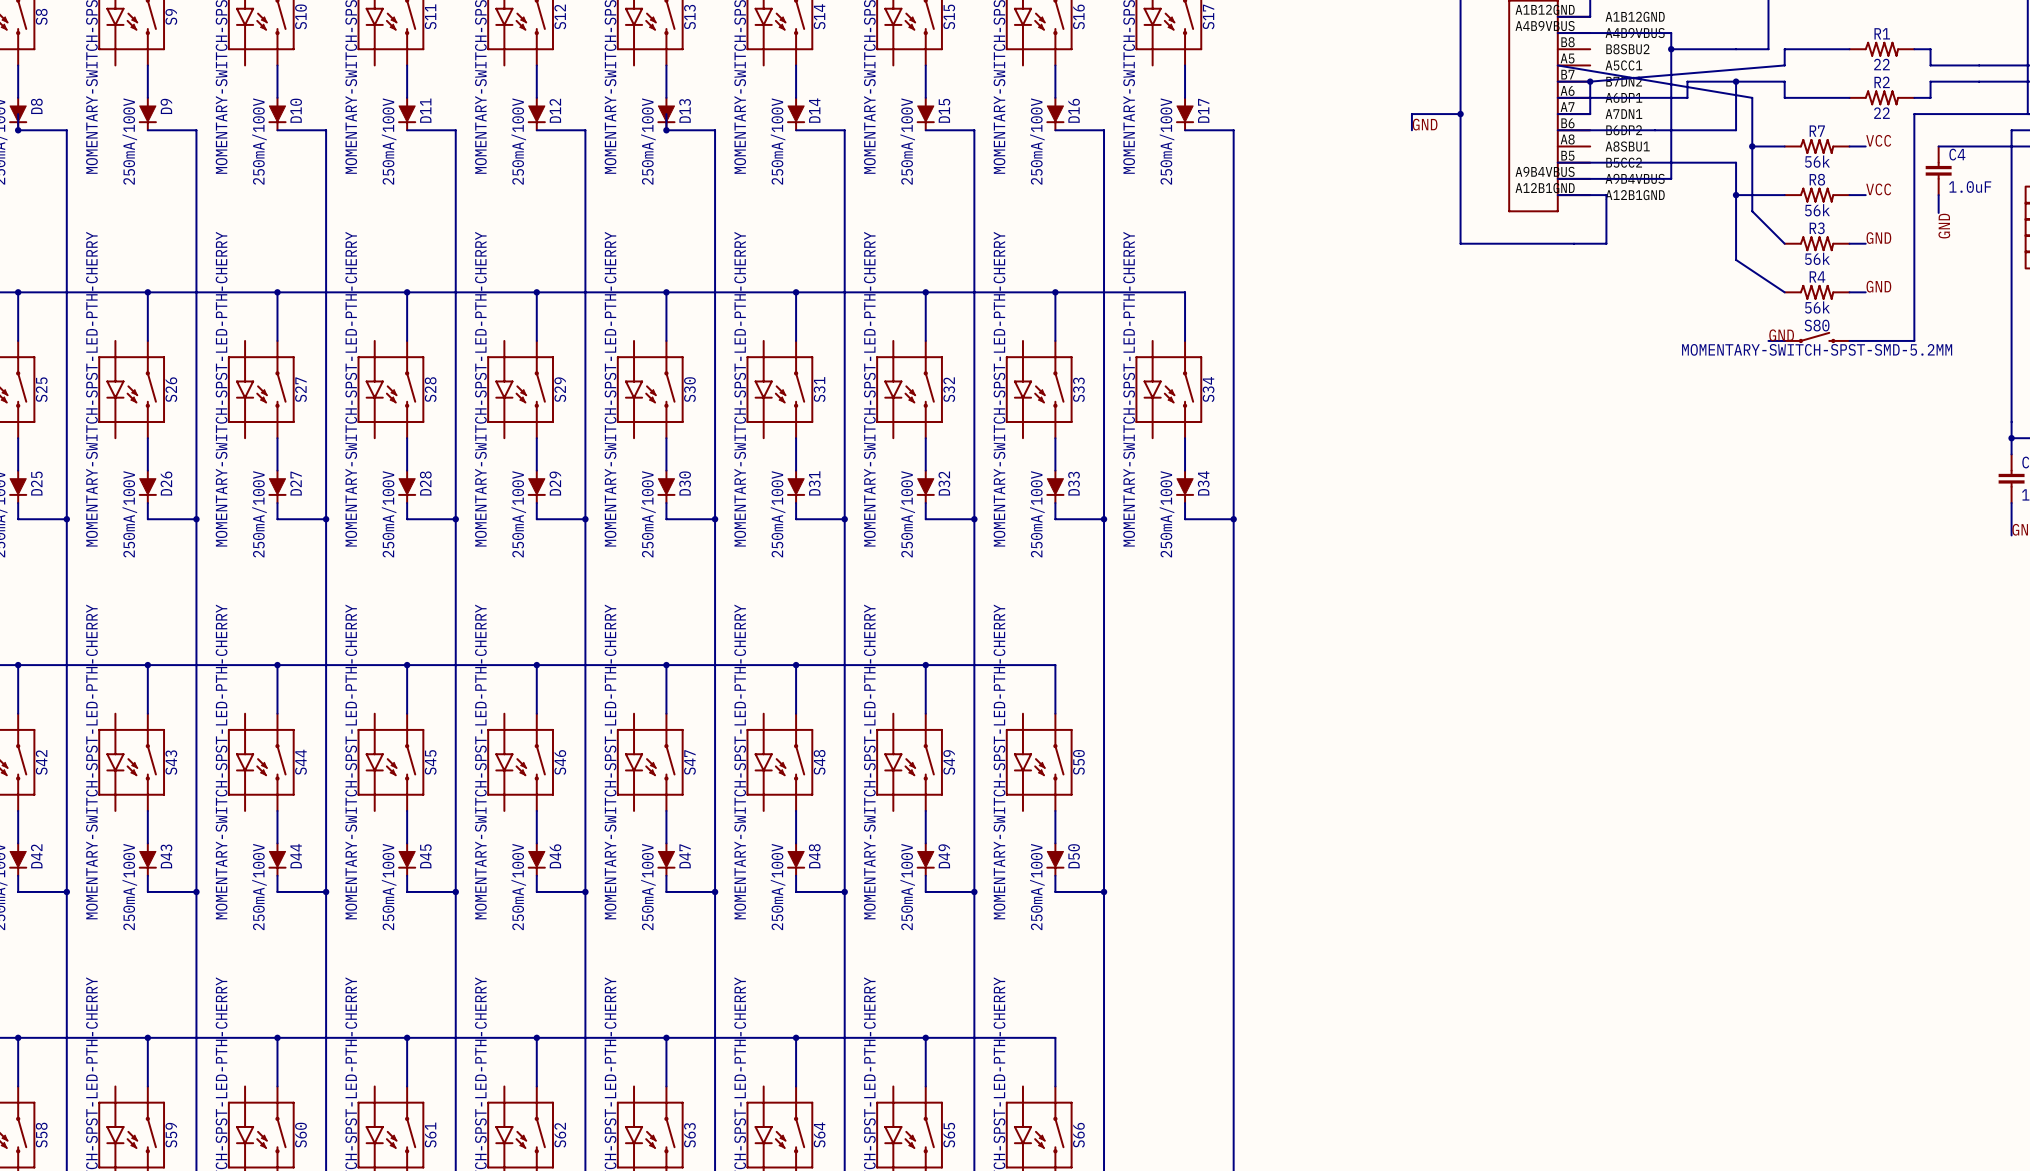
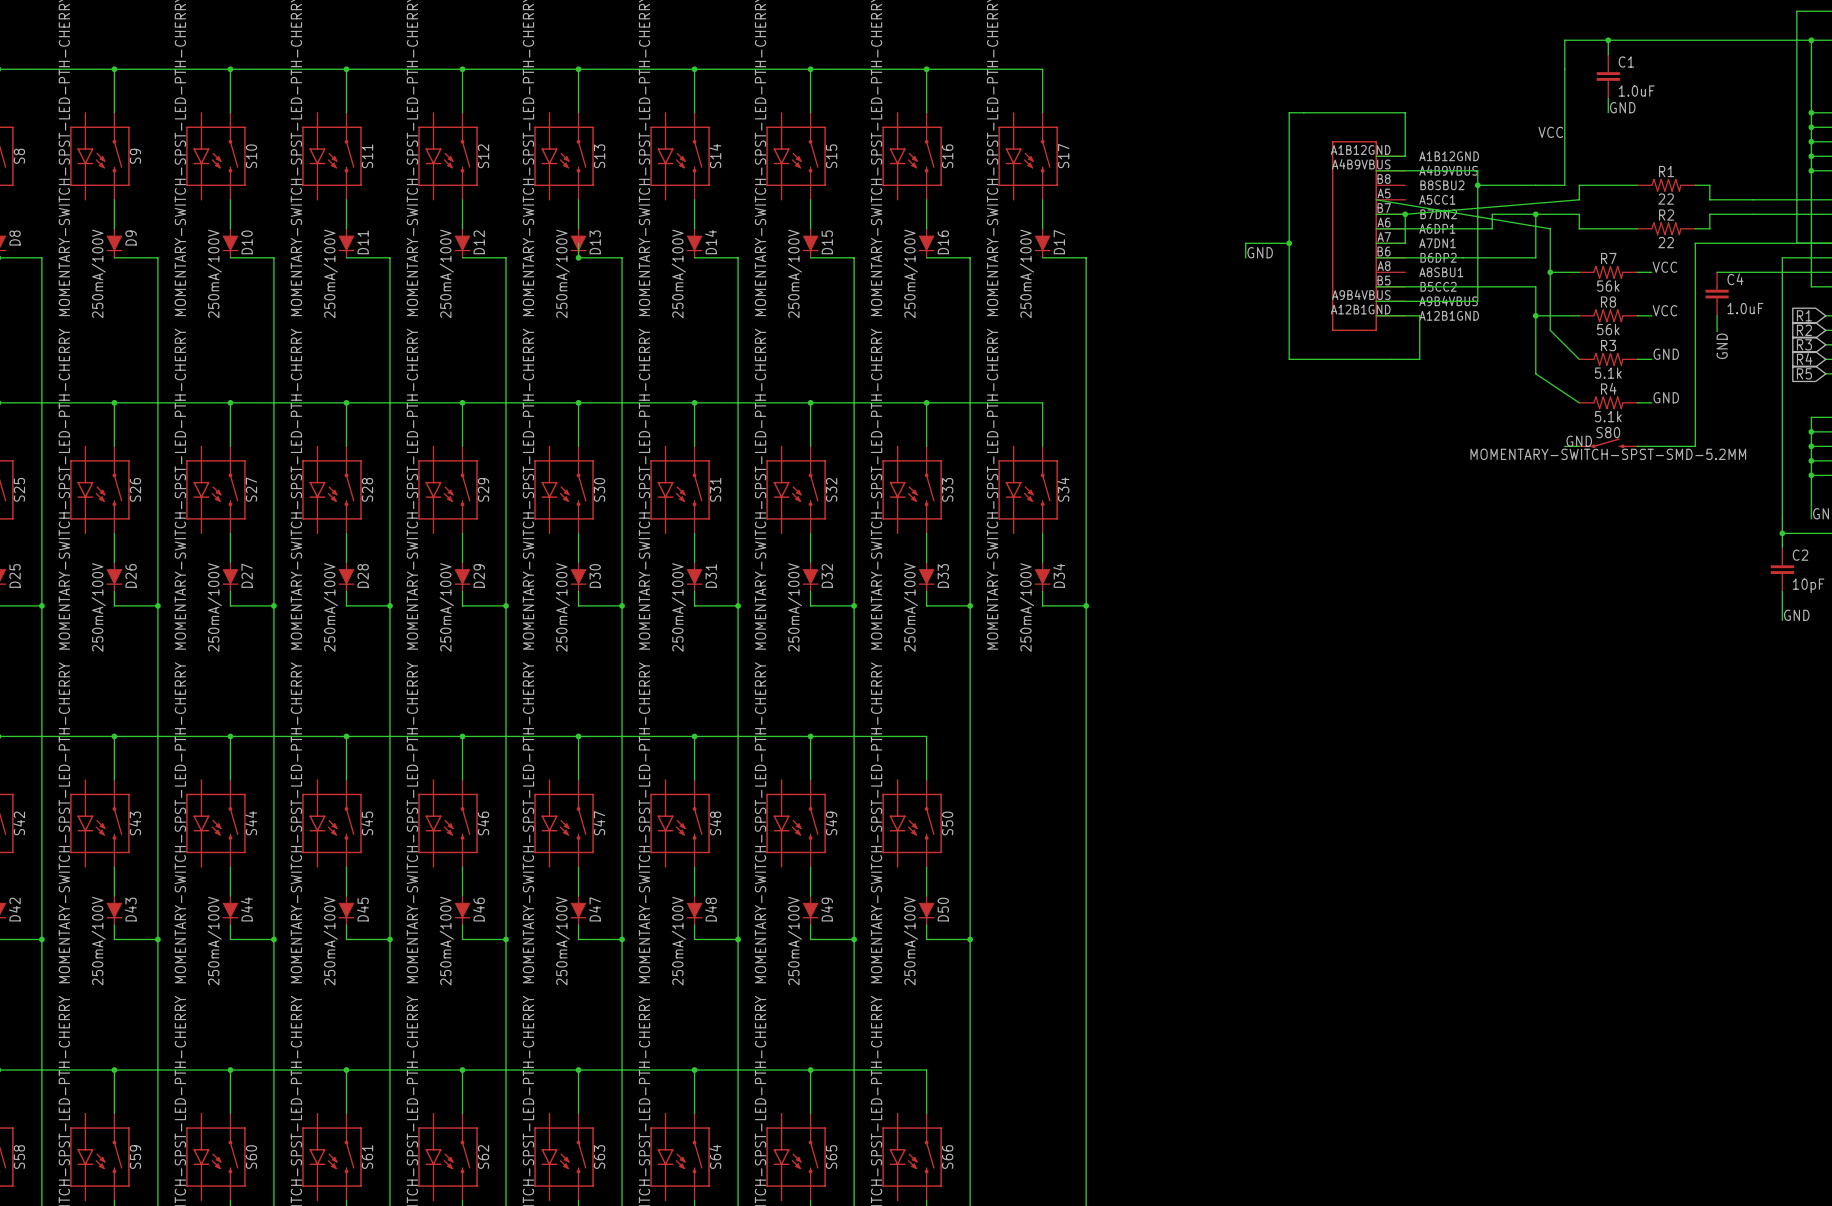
R3 value: 56k (1817, 258) -> 5.1k (1608, 373)
R4 value: 56k (1817, 307) -> 5.1k (1608, 416)

